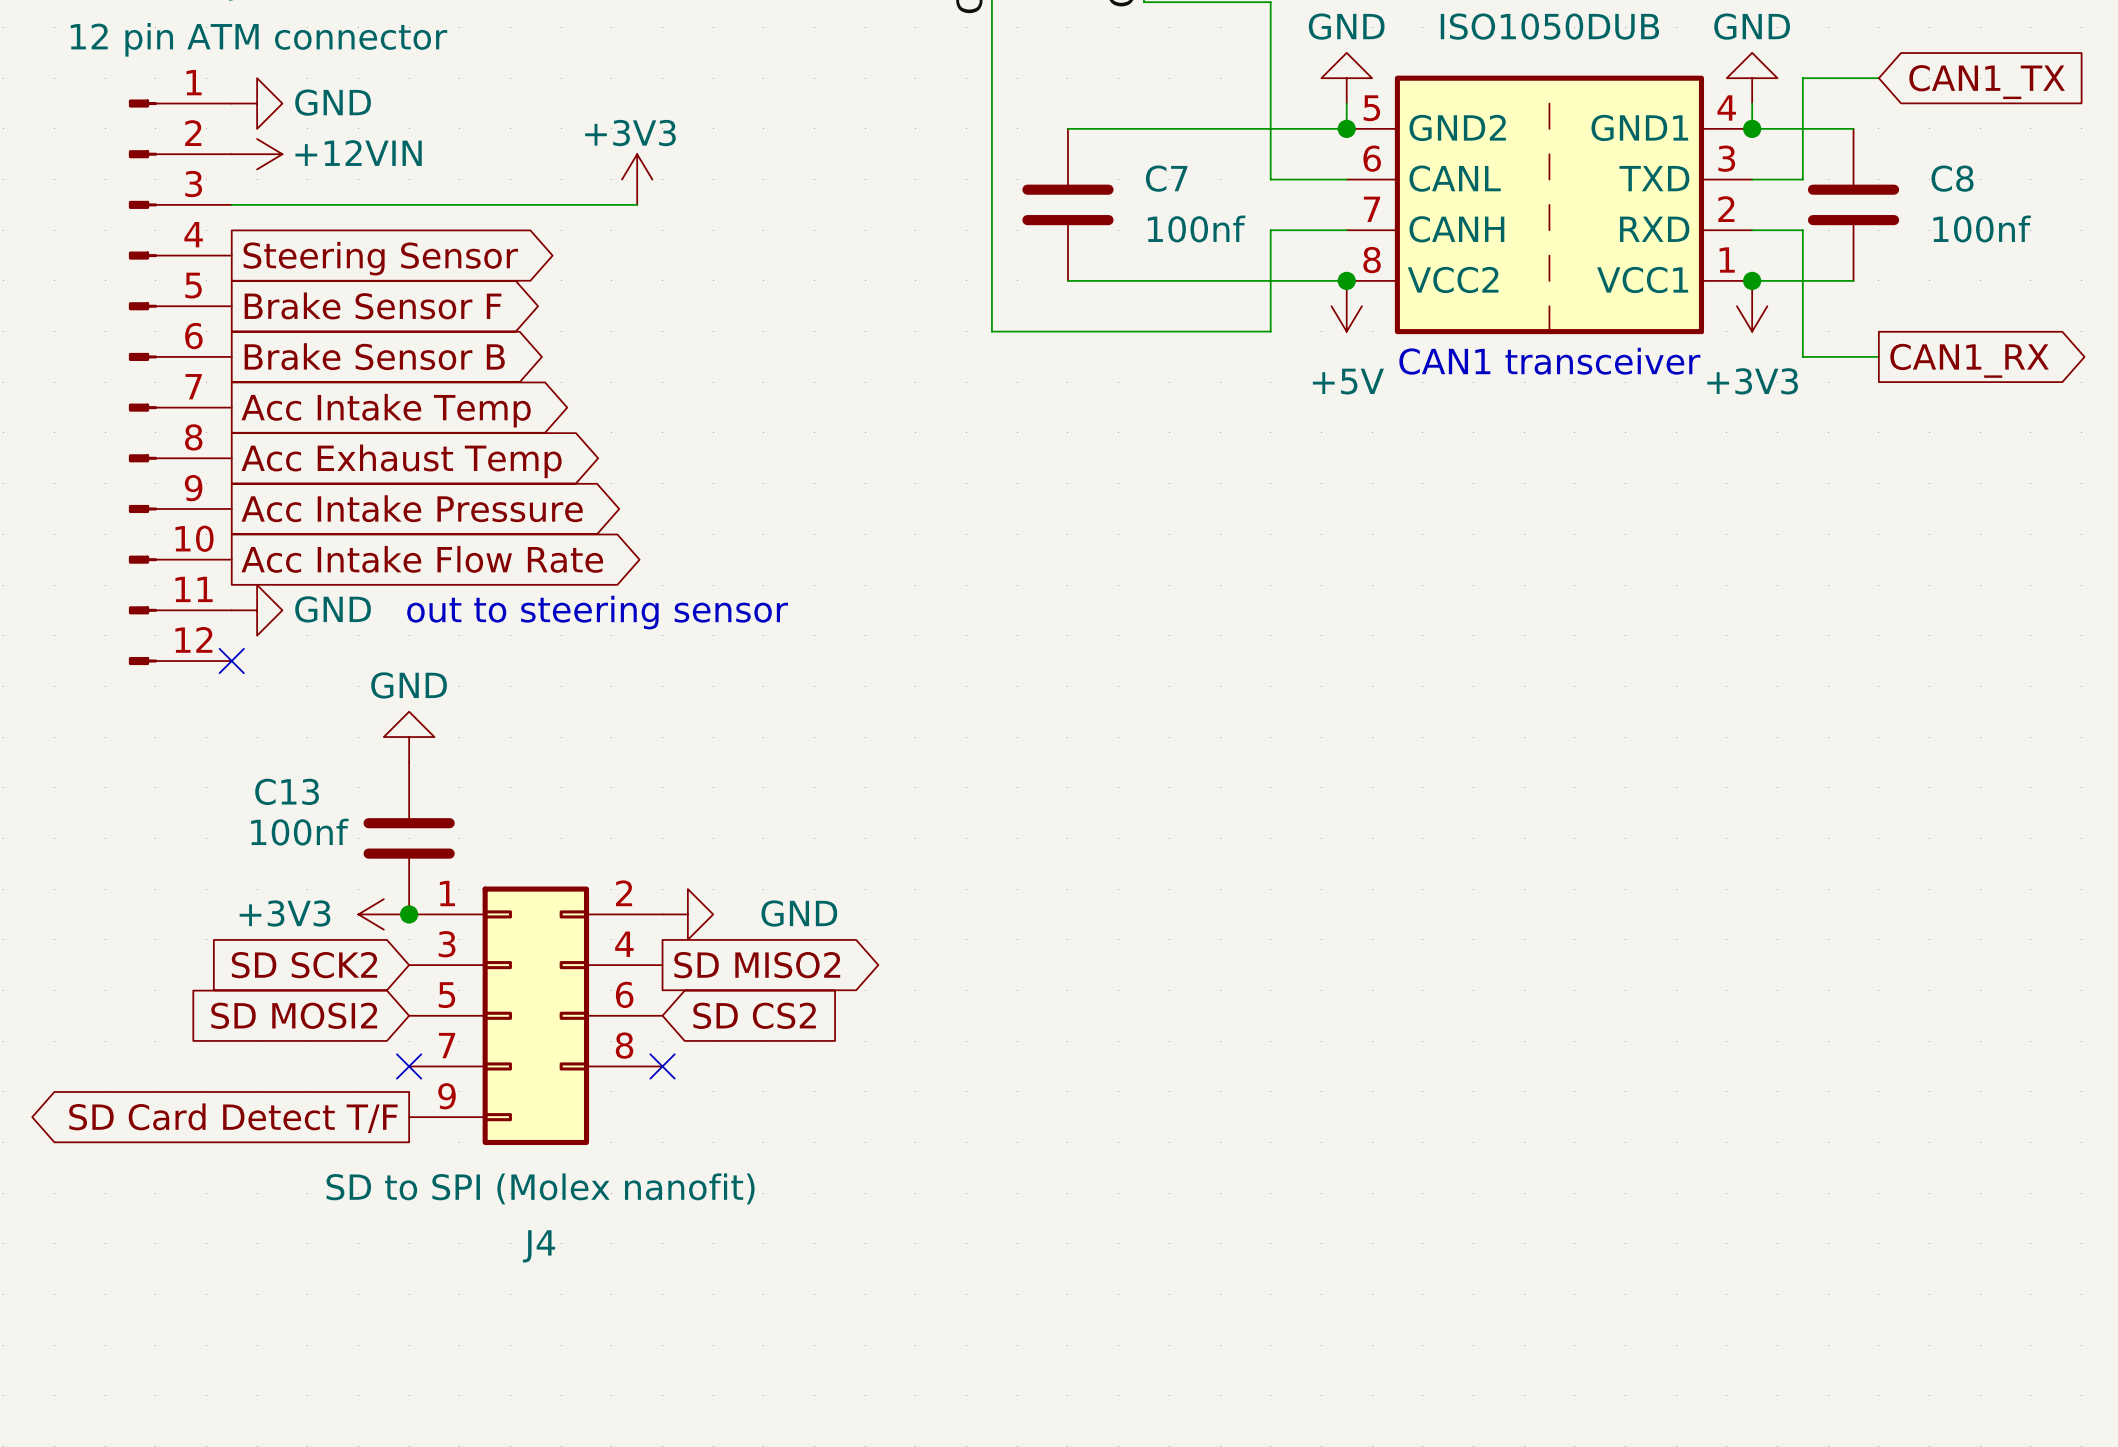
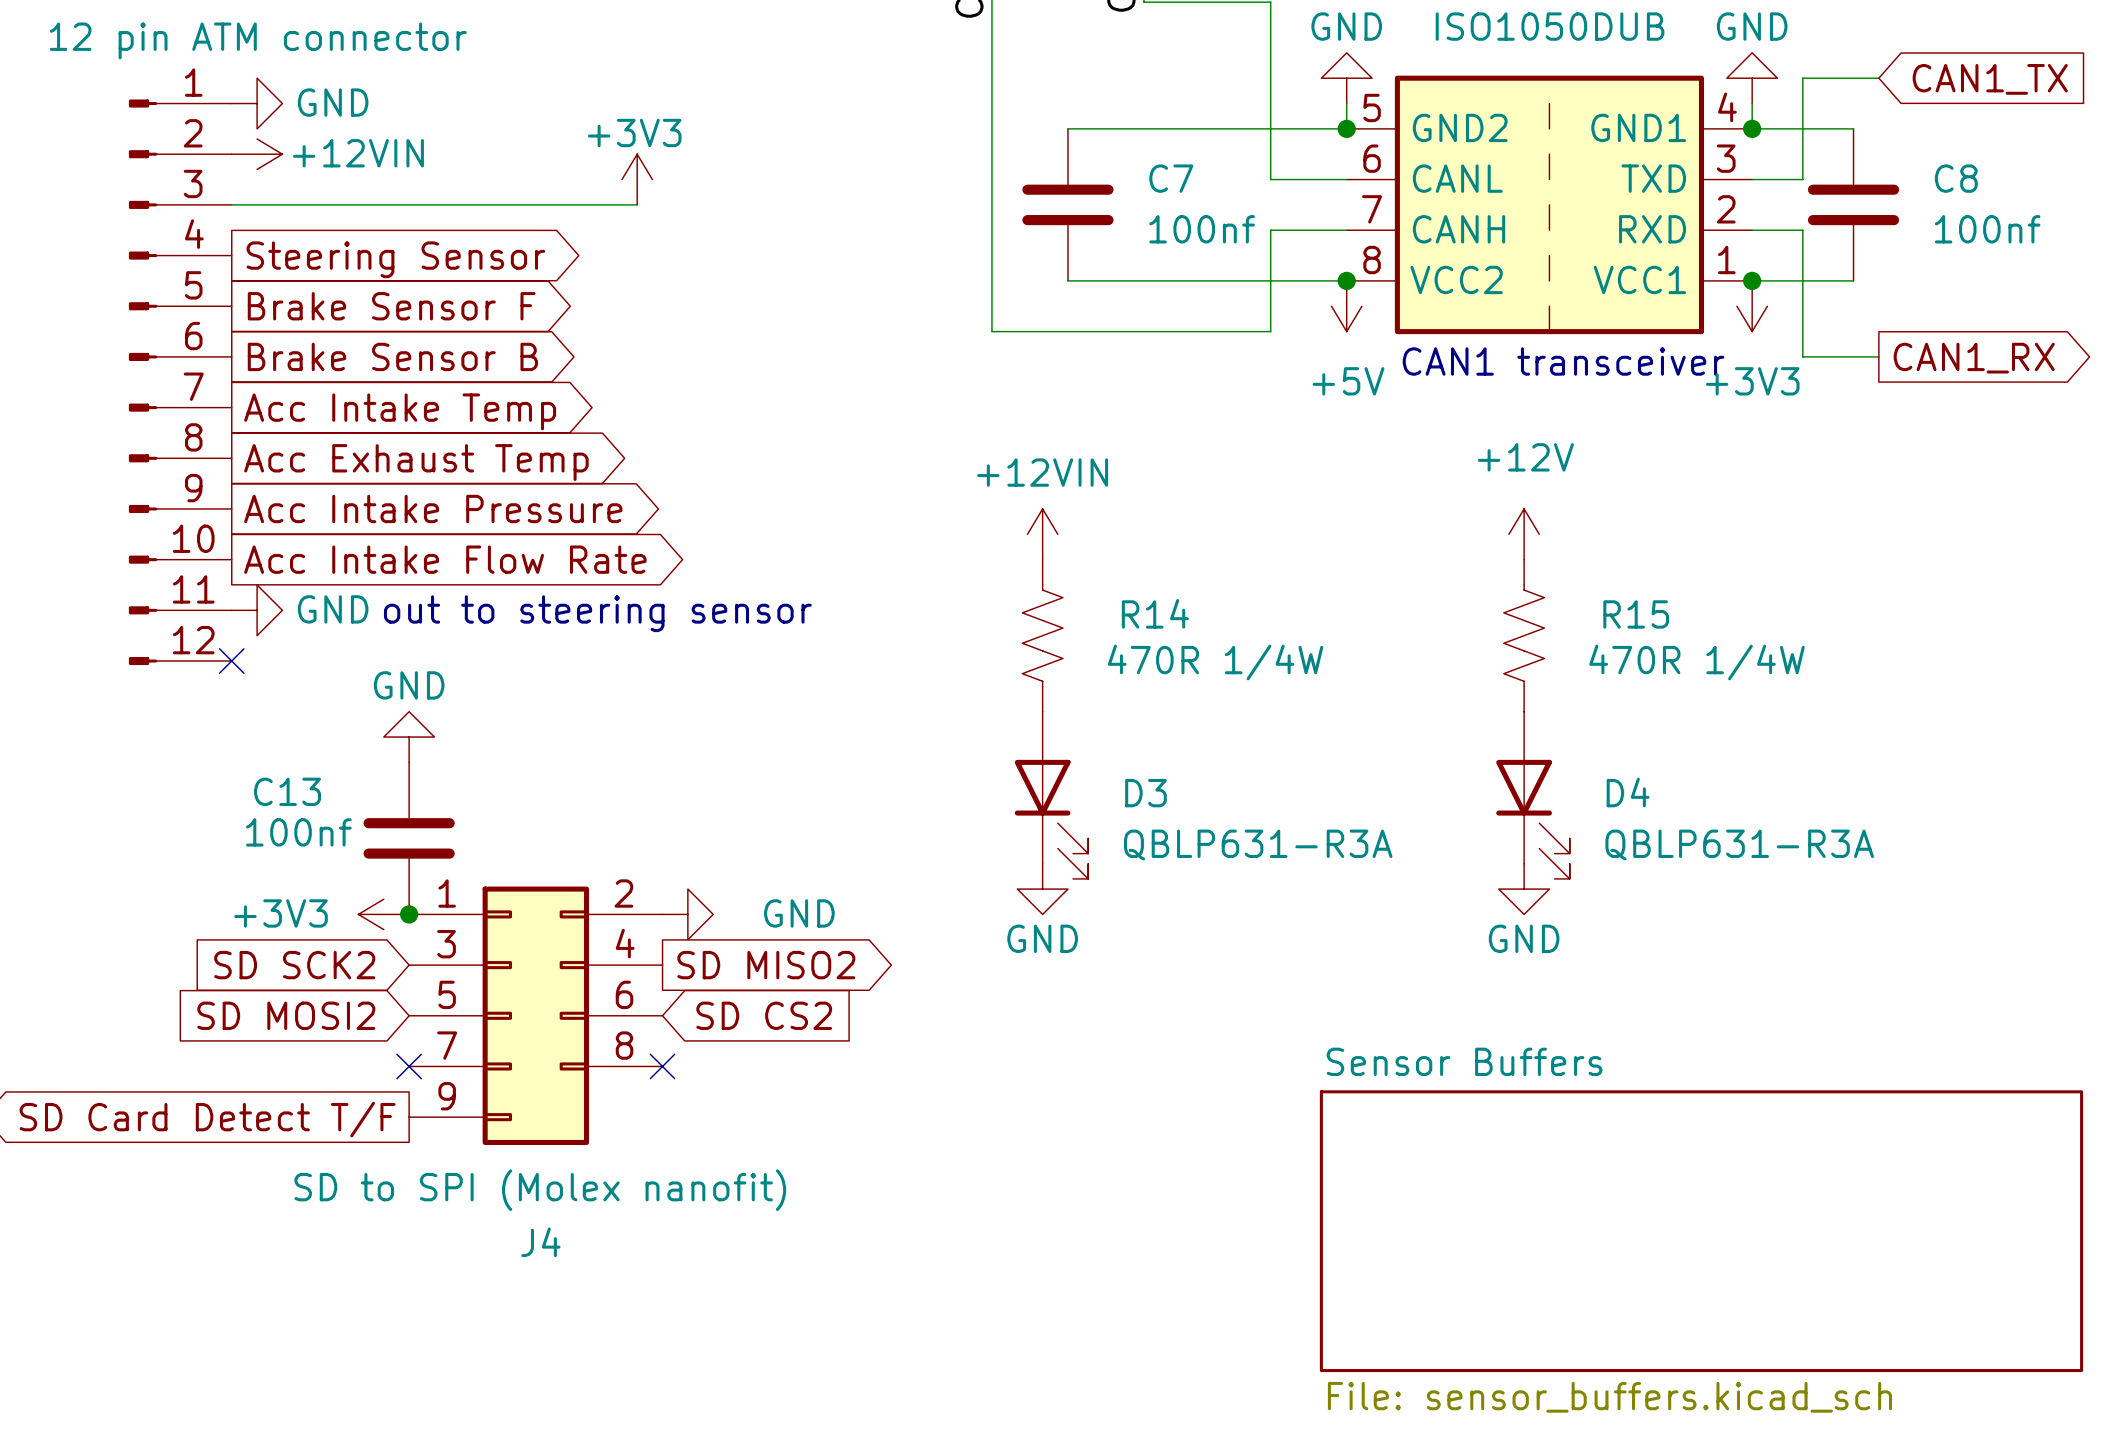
power symbol: none -> +12VIN (1042, 534)
power symbol: none -> +12V (1524, 534)
R14: none -> 470R 1/4W (1042, 635)
R15: none -> 470R 1/4W (1524, 635)
D3: none -> QBLP631-R3A (1051, 795)
D4: none -> QBLP631-R3A (1532, 795)
power symbol: none -> GND (1042, 889)
power symbol: none -> GND (1524, 889)
sheet Sensor Buffers: none -> File: sensor_buffers.kicad_sch (1701, 1231)

